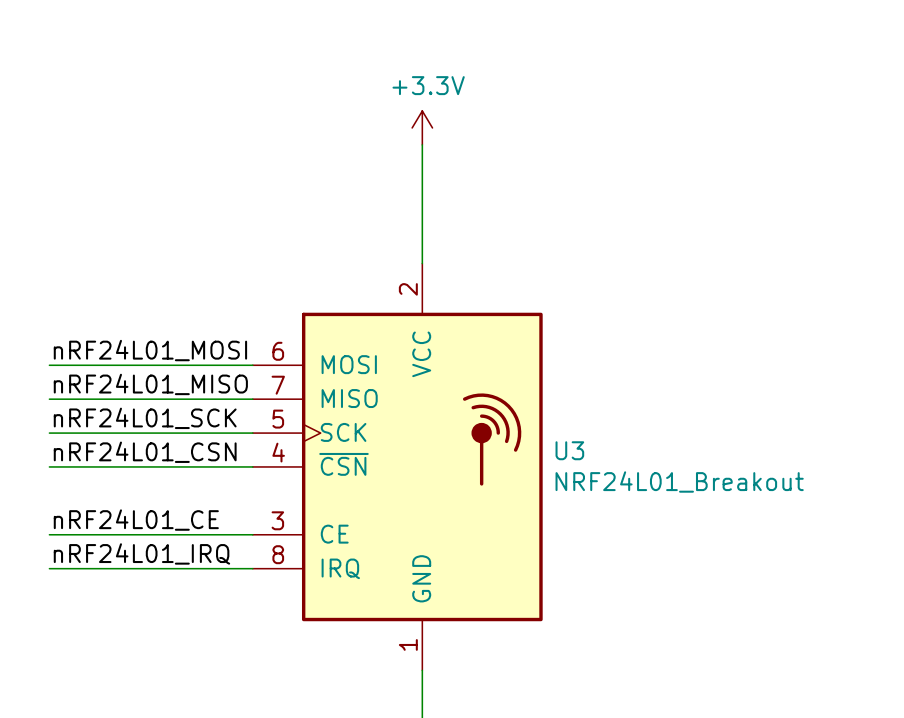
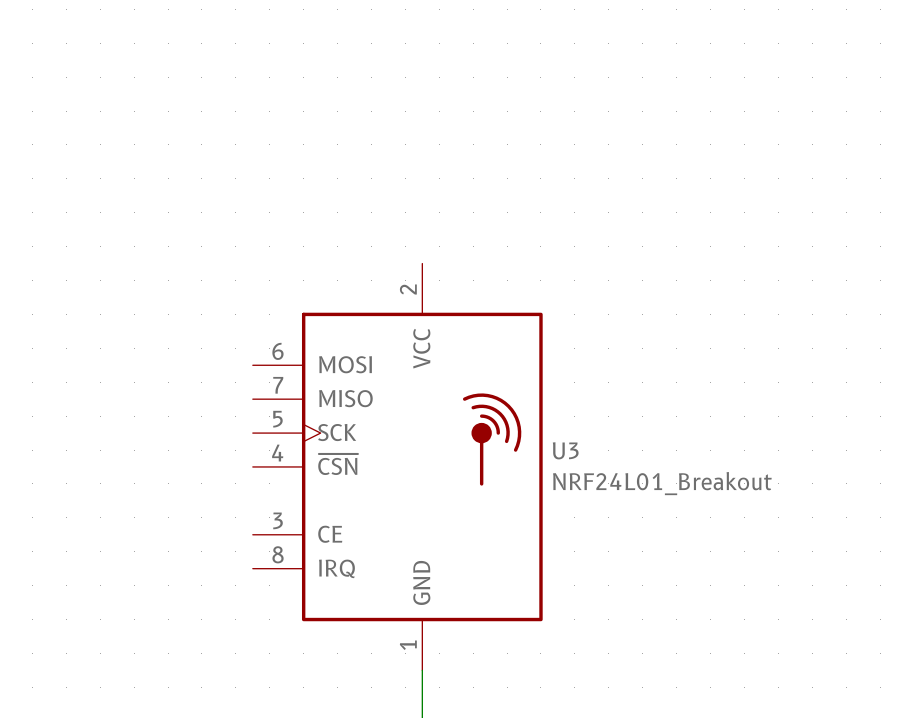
power symbol: +3.3V (422, 127) -> none
wire: (422, 144) (422, 263) -> none
label: nRF24L01_MOSI (150, 350) -> none
wire: (49, 365) (252, 365) -> none
label: nRF24L01_MISO (150, 384) -> none
wire: (49, 399) (252, 399) -> none
label: nRF24L01_SCK (145, 418) -> none
wire: (49, 433) (252, 433) -> none
label: nRF24L01_CSN (145, 452) -> none
wire: (49, 466) (252, 466) -> none
label: nRF24L01_CE (136, 520) -> none
wire: (49, 534) (252, 534) -> none
label: nRF24L01_IRQ (141, 553) -> none
wire: (49, 568) (252, 568) -> none

